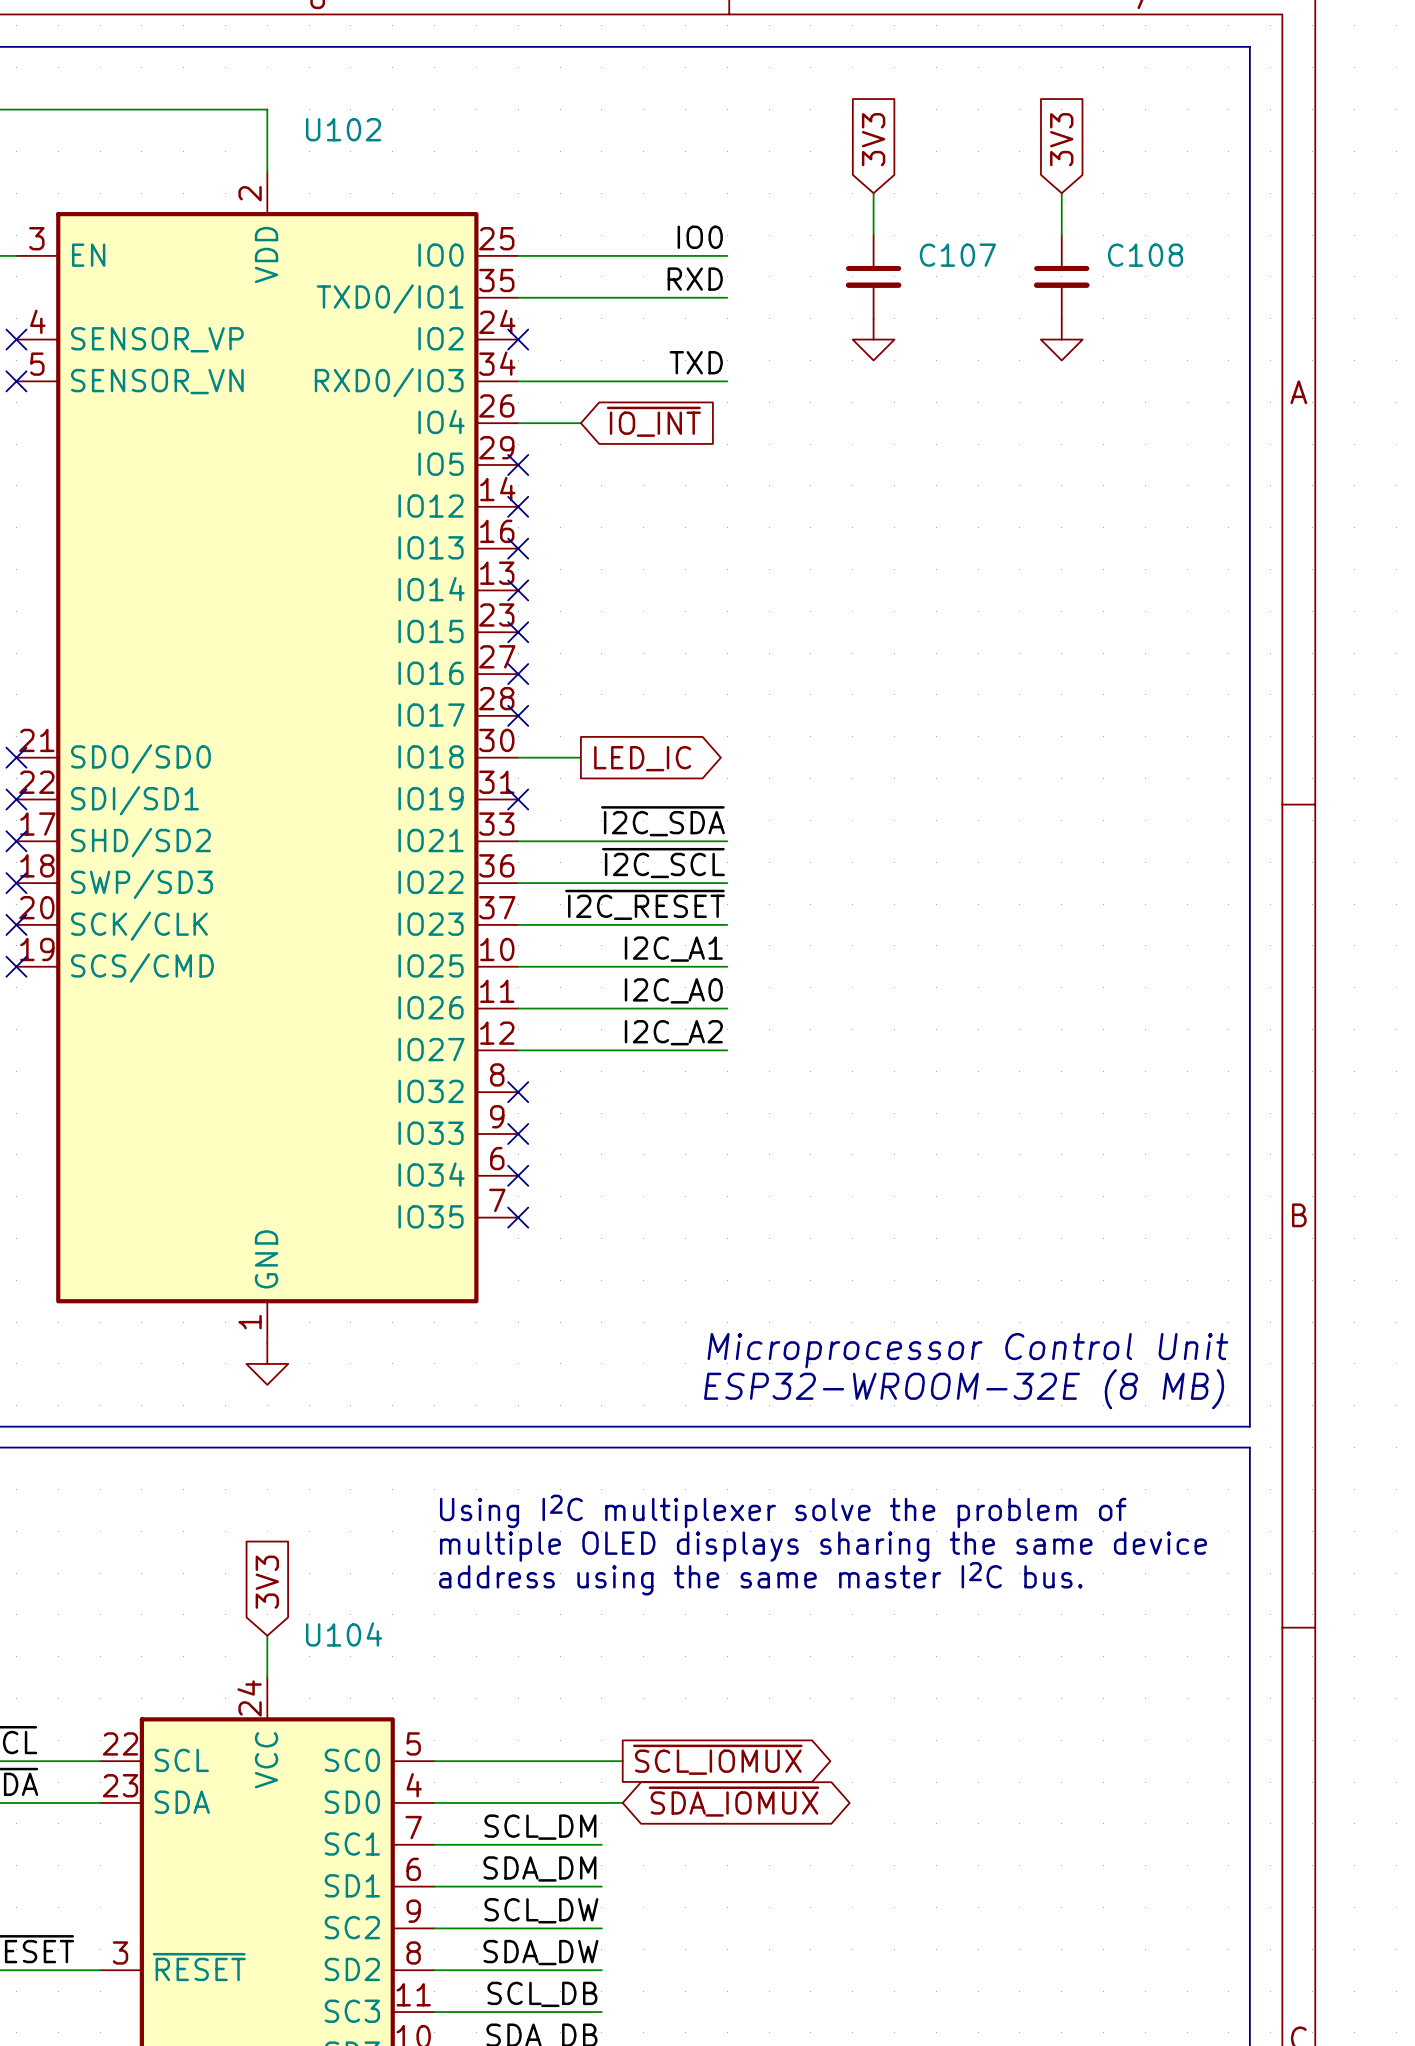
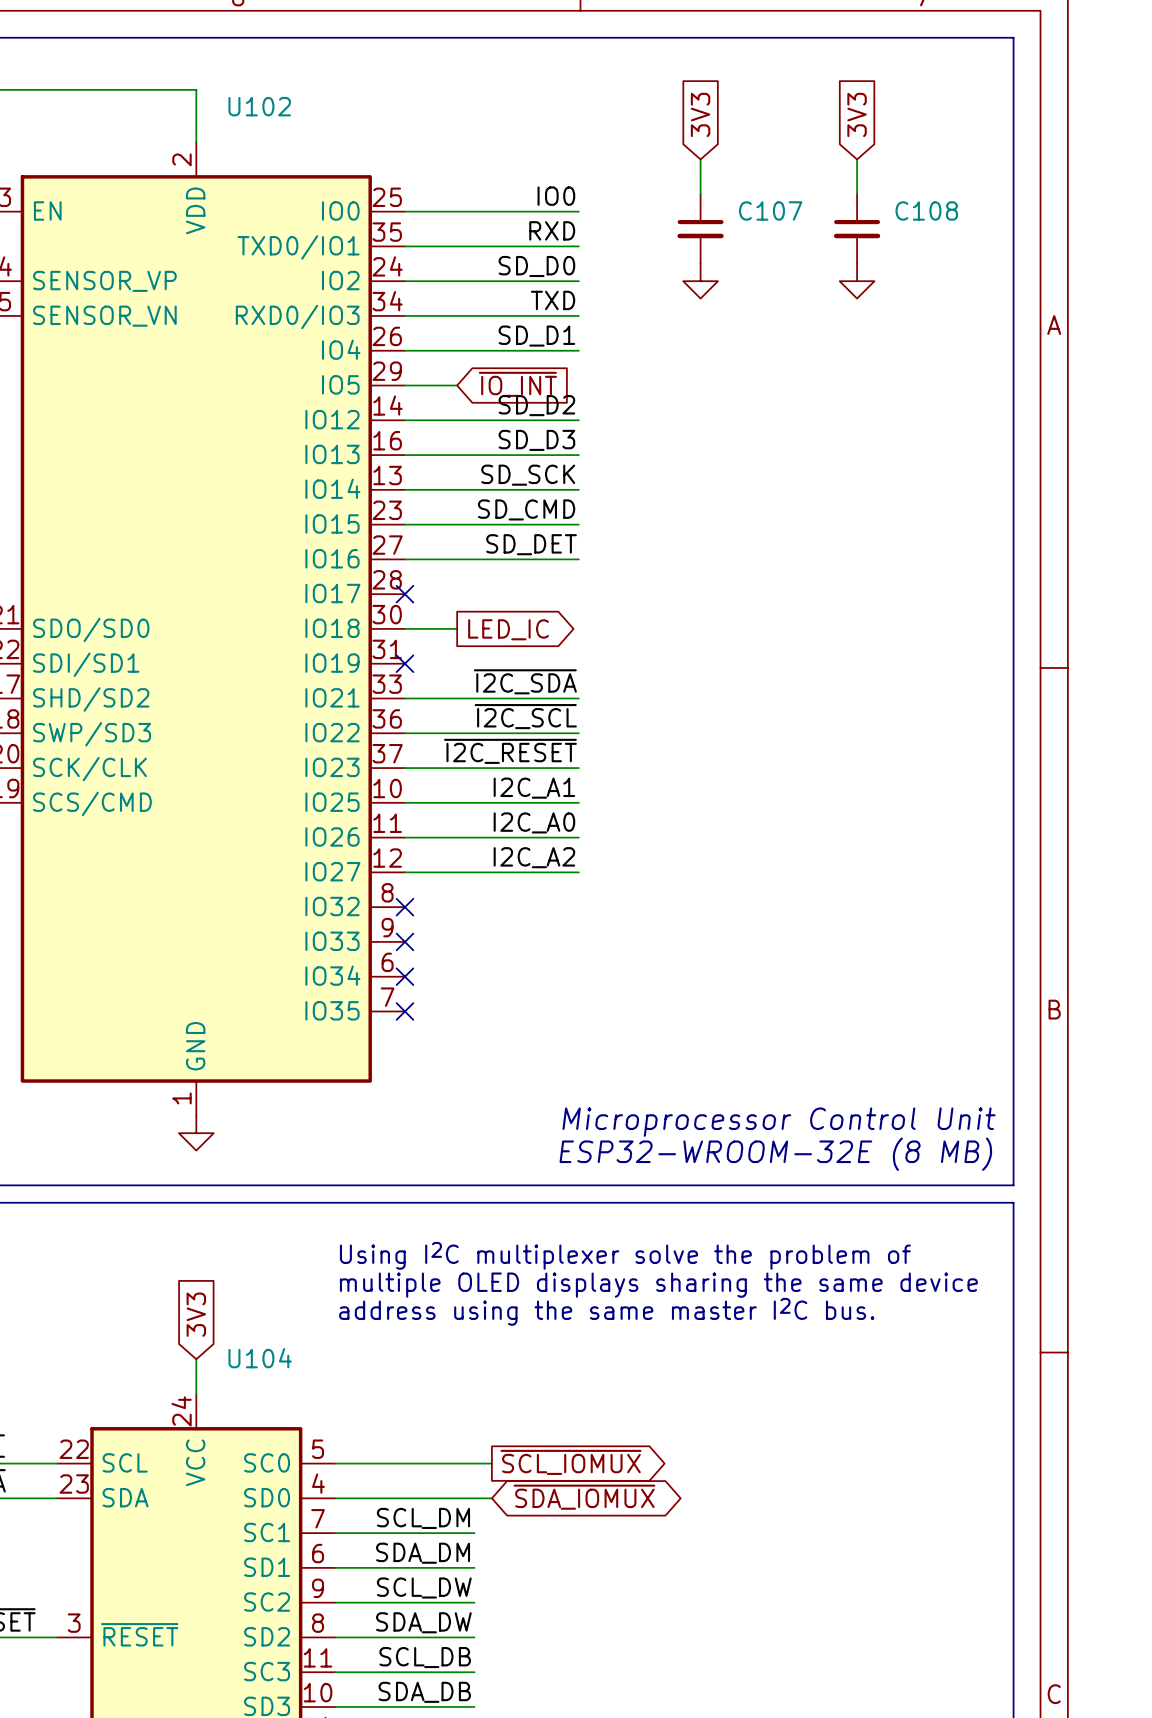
label: none -> SD_D0 (536, 266)
wire: none -> (404, 281) (578, 281)
no-connect mark: (518, 339) -> none
label: none -> SD_D1 (536, 336)
global label position: ~{IO_INT} (653, 421) -> ~{IO_INT} (517, 384)
wire: none -> (457, 350) (578, 350)
wire: none -> (404, 385) (457, 385)
no-connect mark: (518, 464) -> none
label: none -> SD_D2 (536, 405)
wire: none -> (404, 420) (578, 420)
no-connect mark: (518, 506) -> none
label: none -> SD_D3 (536, 440)
wire: none -> (404, 455) (578, 455)
no-connect mark: (518, 548) -> none
label: none -> SD_SCK (528, 475)
wire: none -> (404, 489) (578, 489)
no-connect mark: (518, 590) -> none
label: none -> SD_CMD (526, 509)
wire: none -> (404, 524) (578, 524)
no-connect mark: (518, 632) -> none
label: none -> SD_DET (531, 544)
wire: none -> (404, 559) (578, 559)
no-connect mark: (518, 674) -> none

